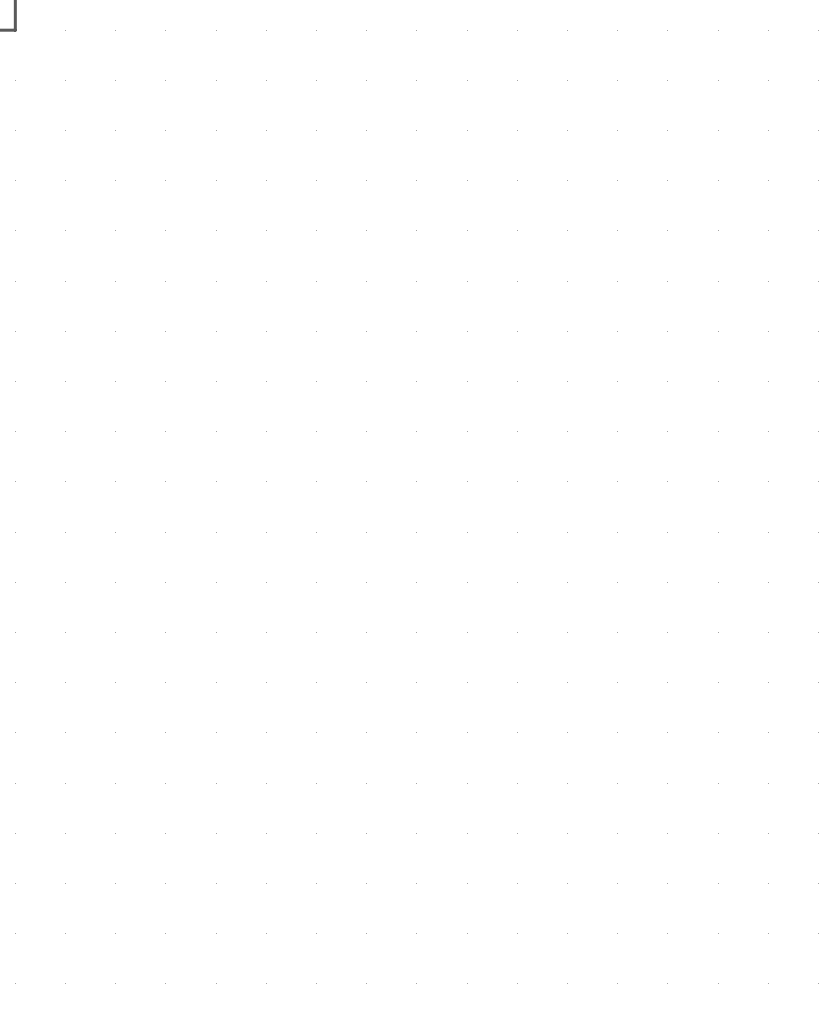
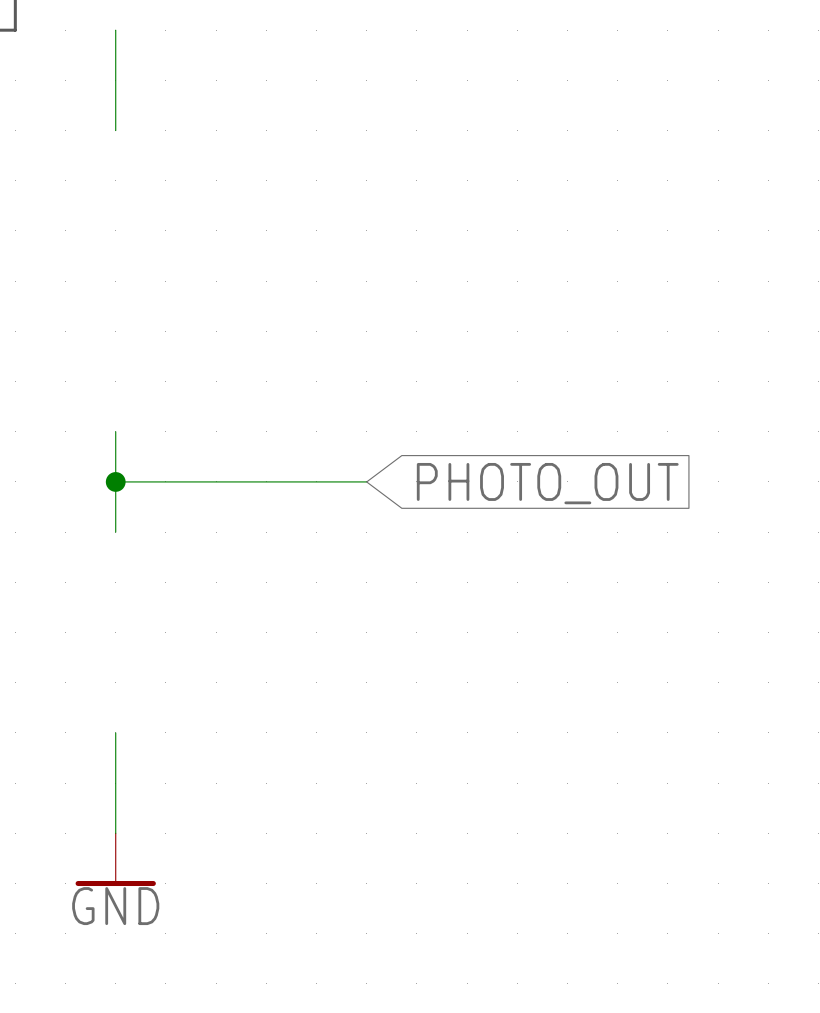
wire: none -> (115, 30) (115, 130)
wire: none -> (115, 431) (115, 532)
wire: none -> (115, 481) (366, 481)
junction: none -> (115, 481)
global label: none -> PHOTO_OUT (547, 483)
wire: none -> (115, 732) (115, 833)
power symbol: none -> GND (115, 859)

